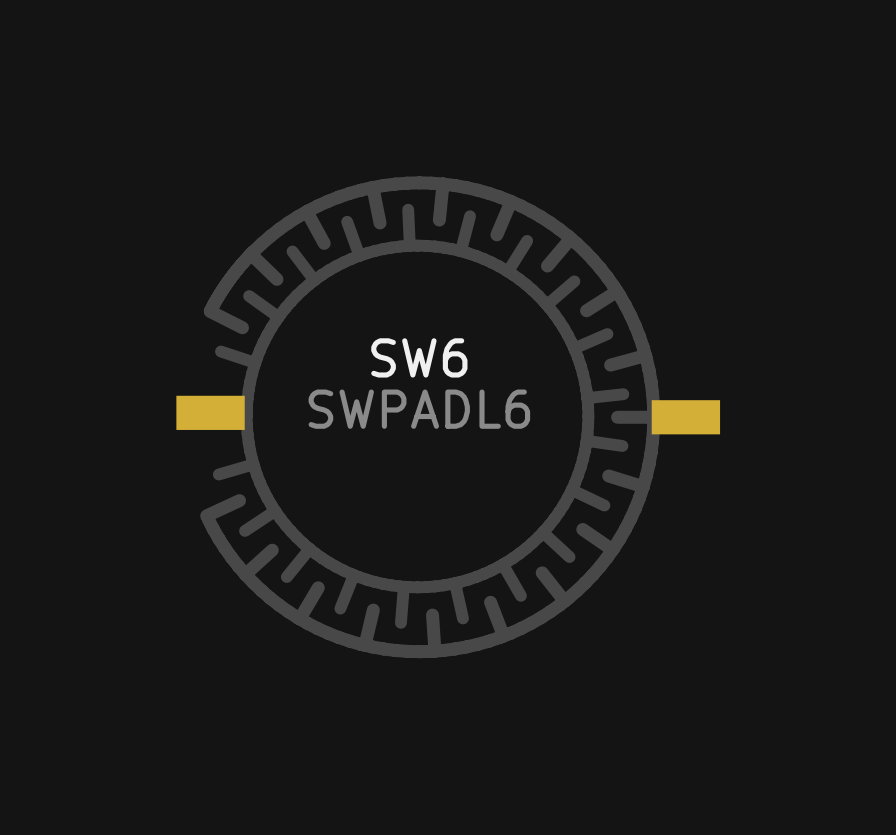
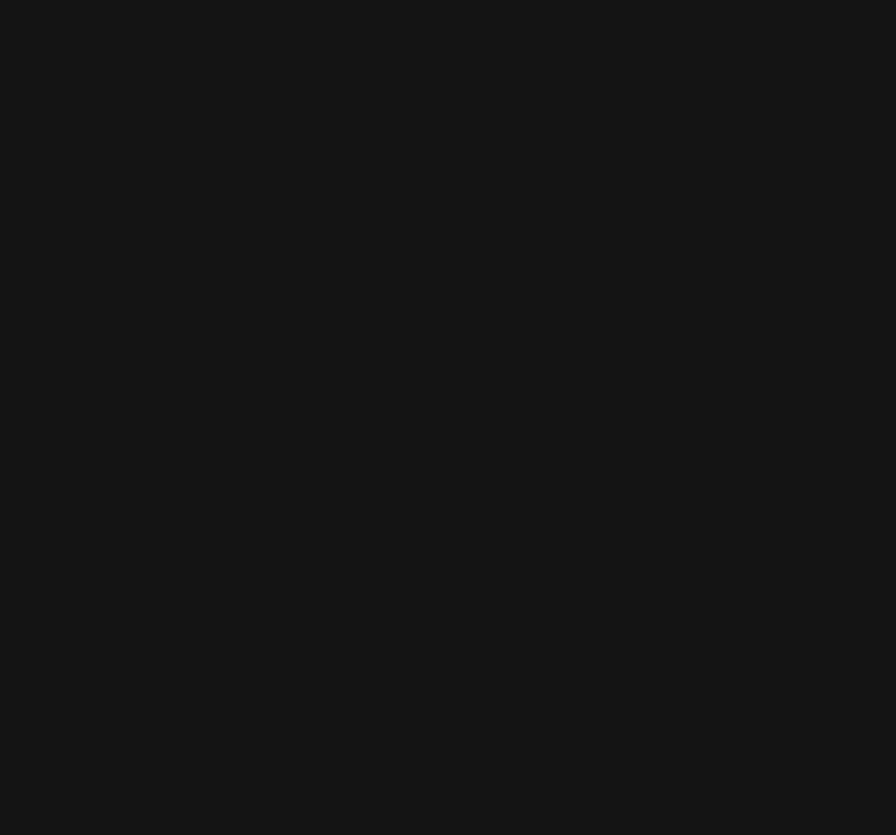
SW6: SWPADL6 (448, 417) -> none

